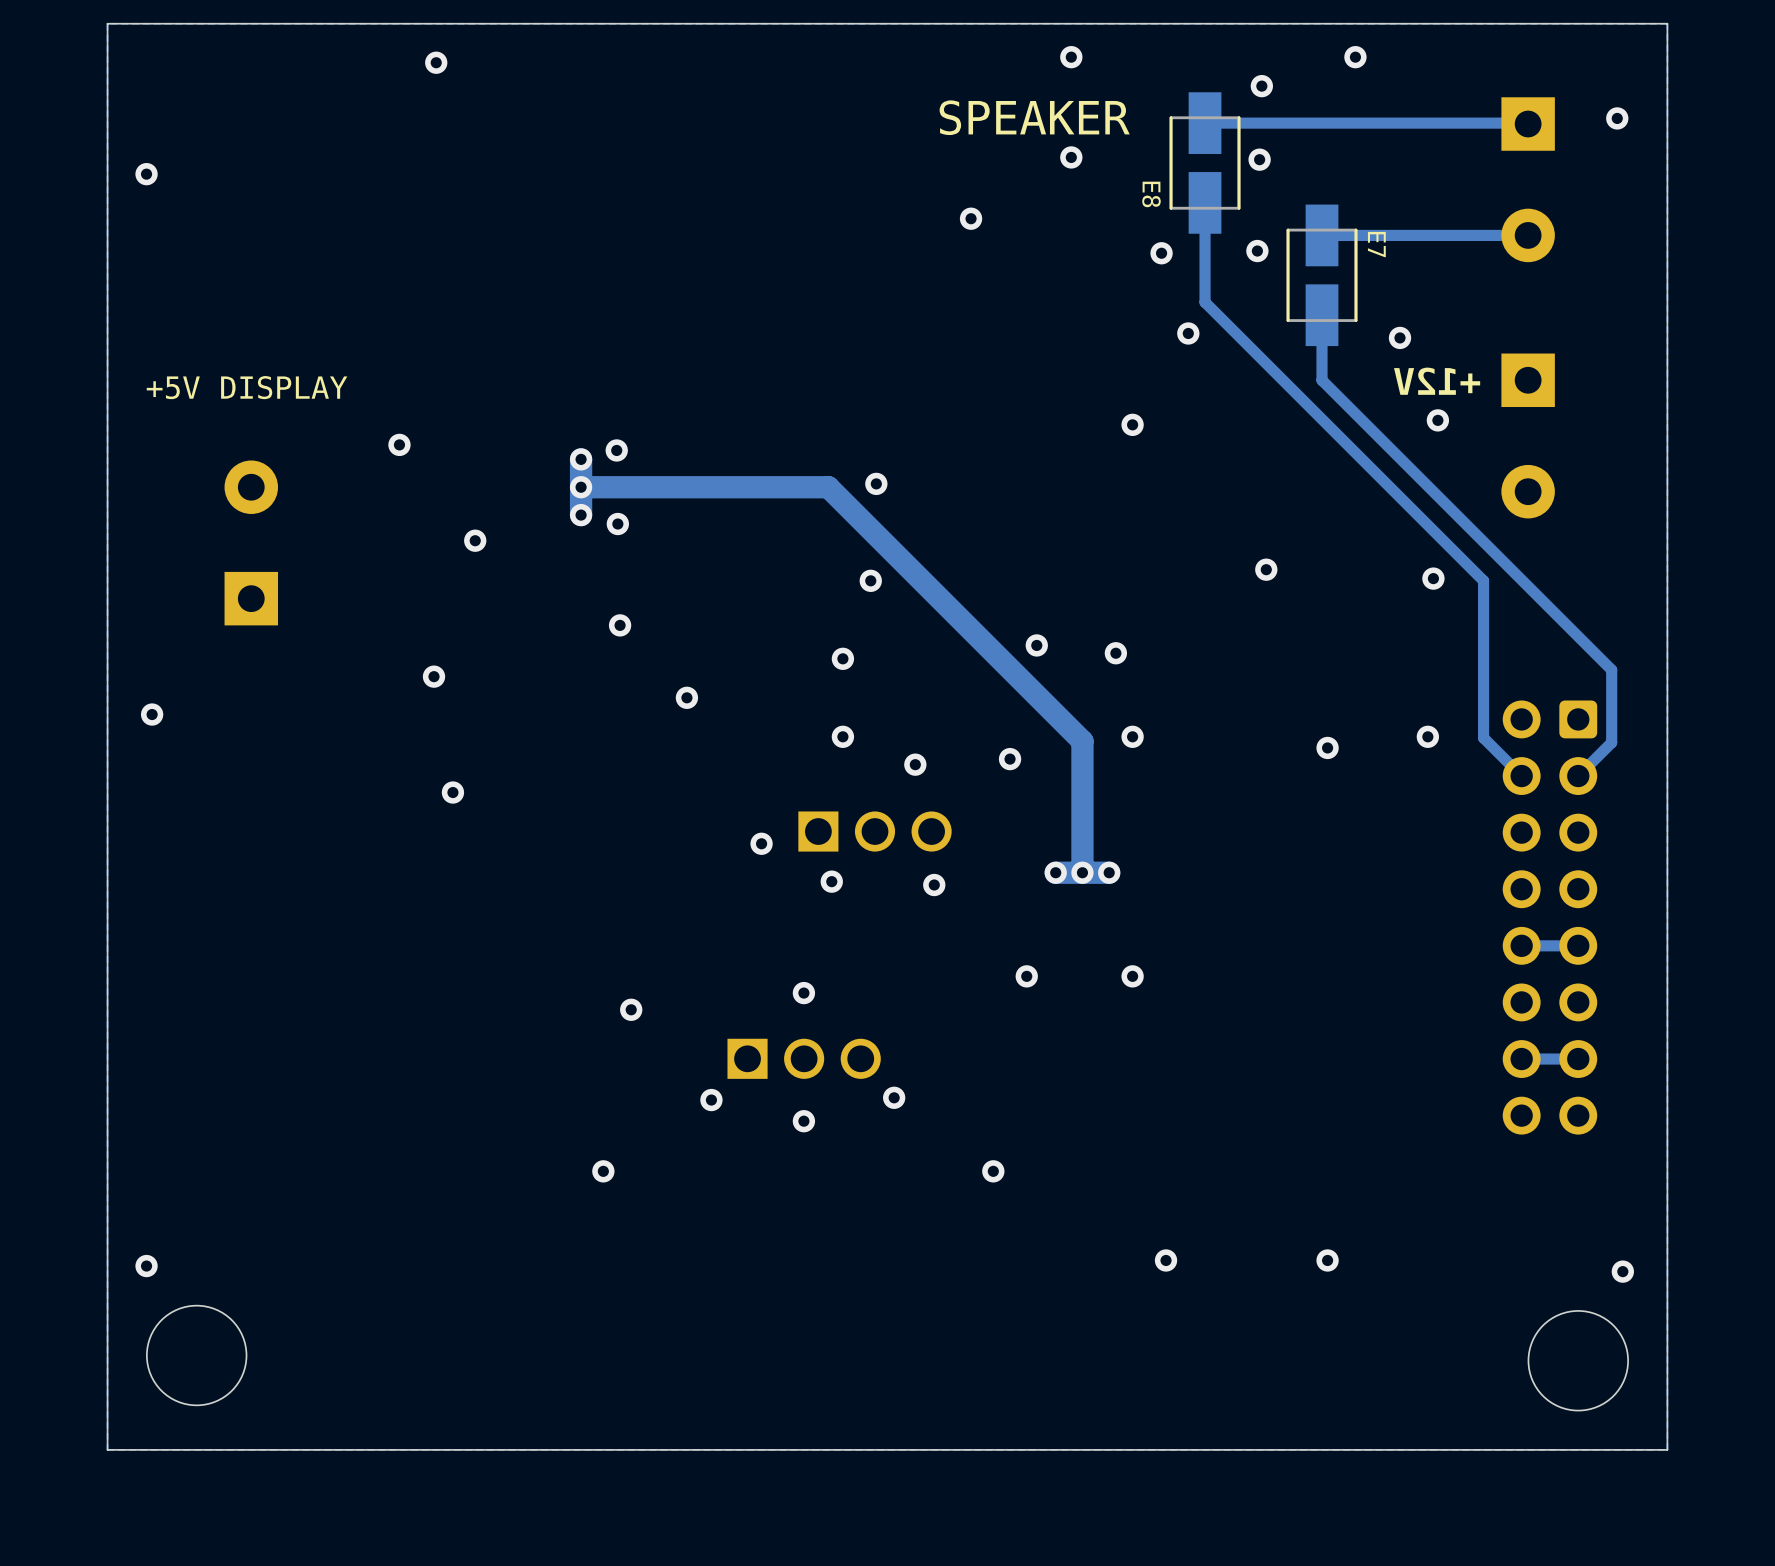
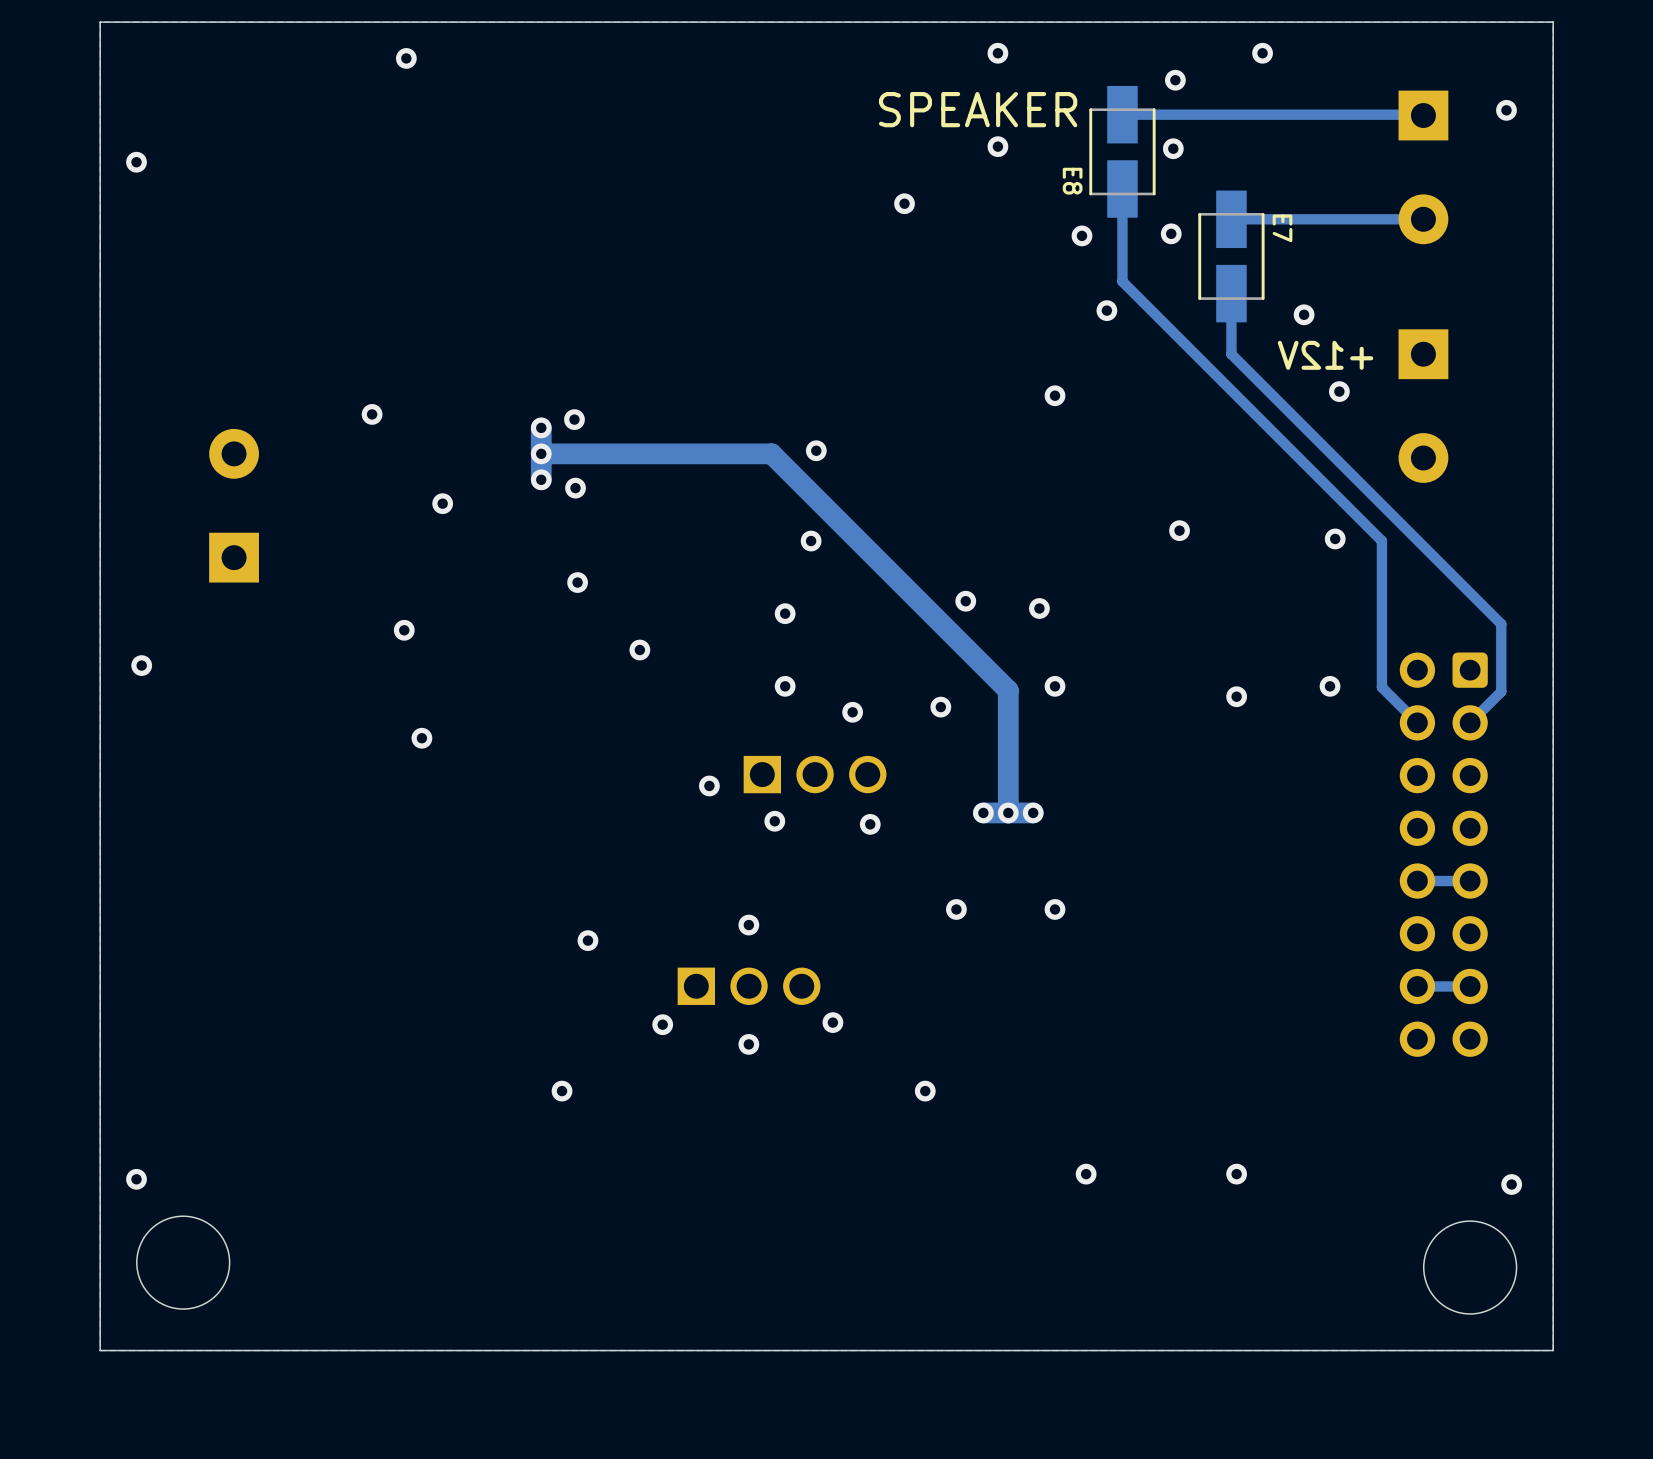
text: +5V DISPLAY (247, 387) -> none

